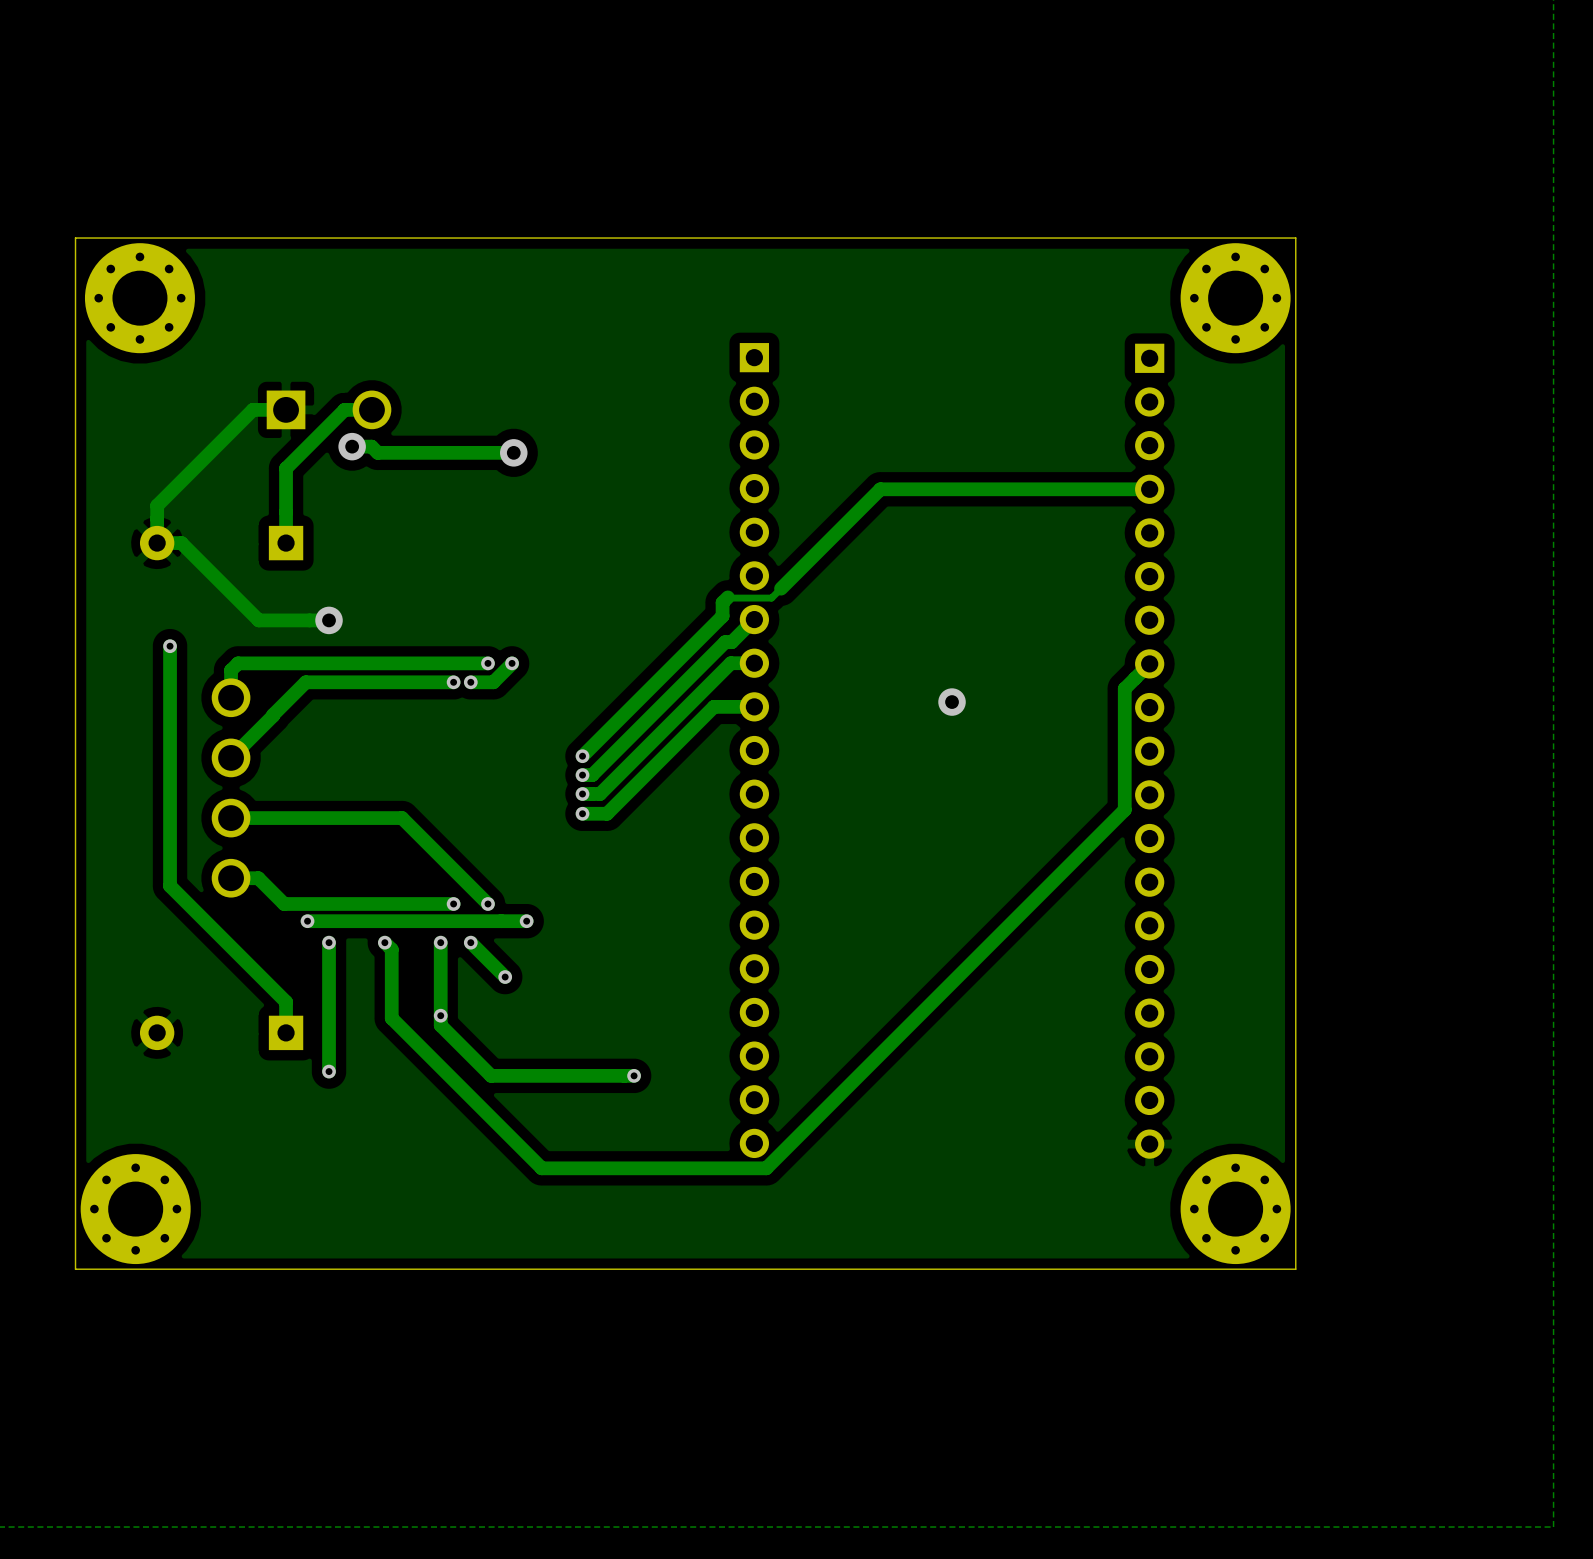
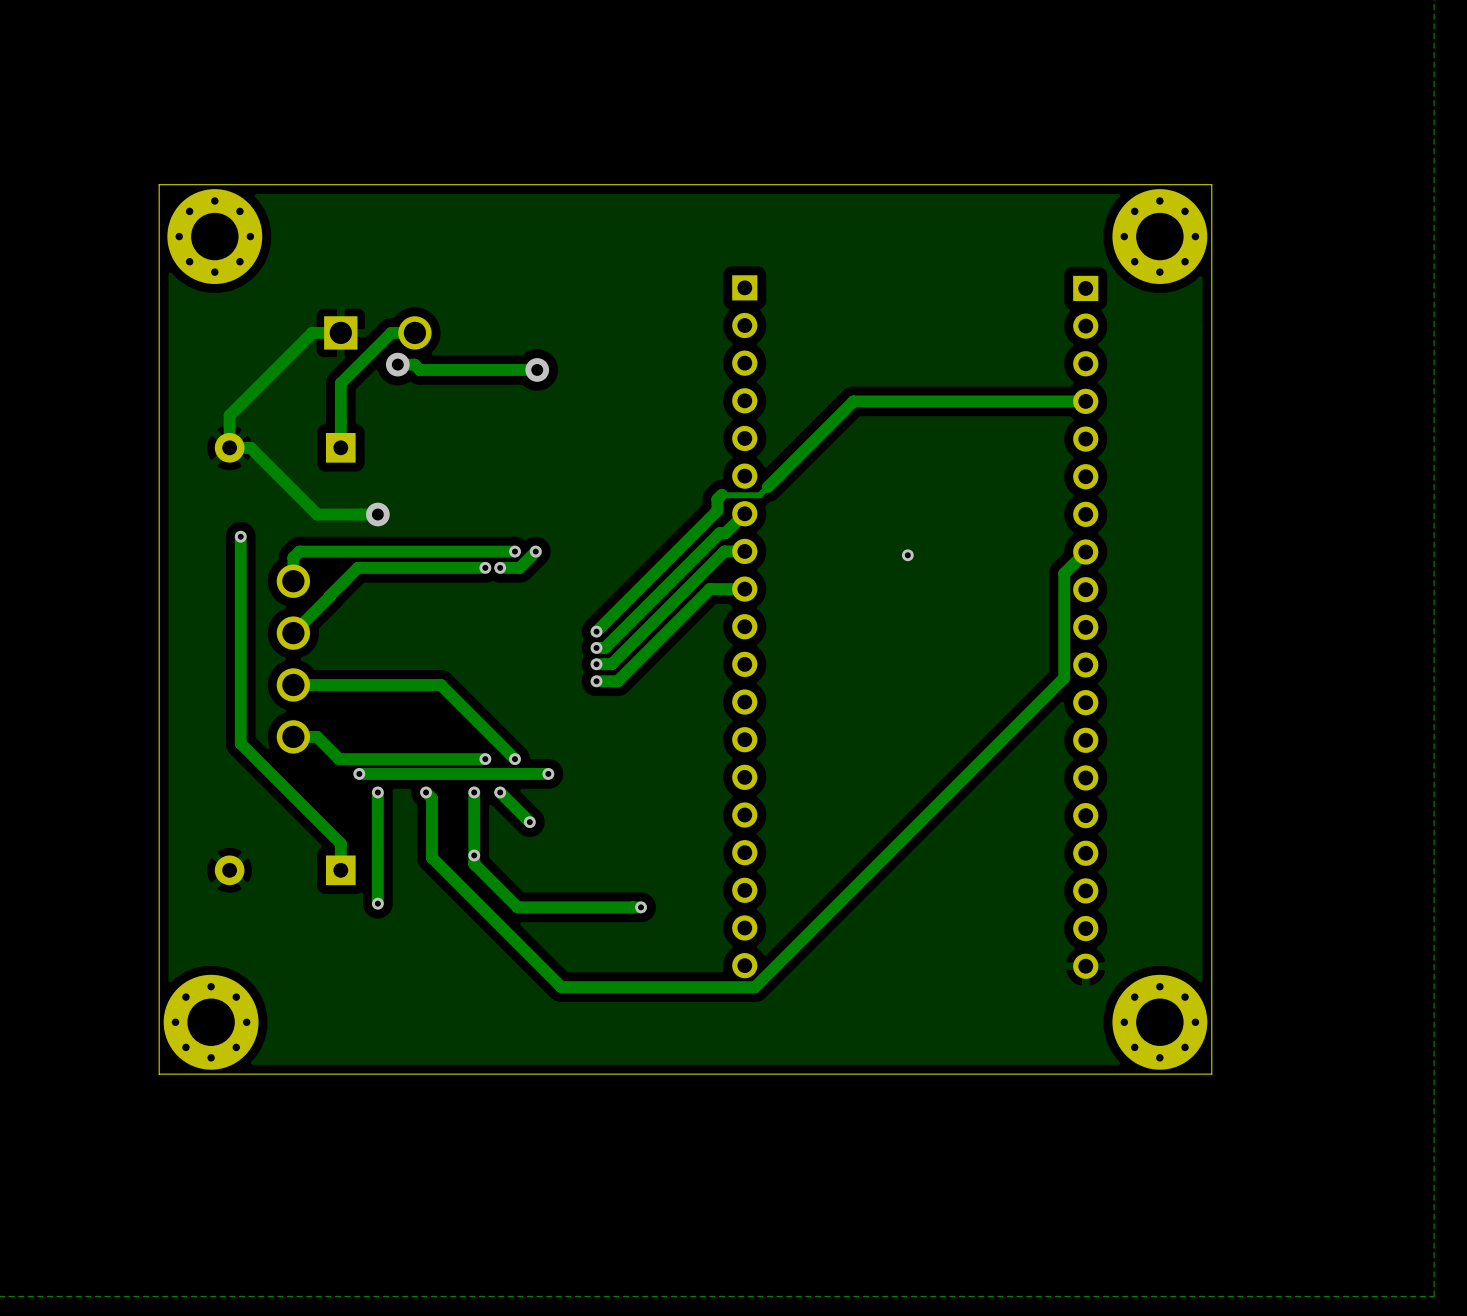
via: none -> (907, 555)
via: (952, 702) -> none

